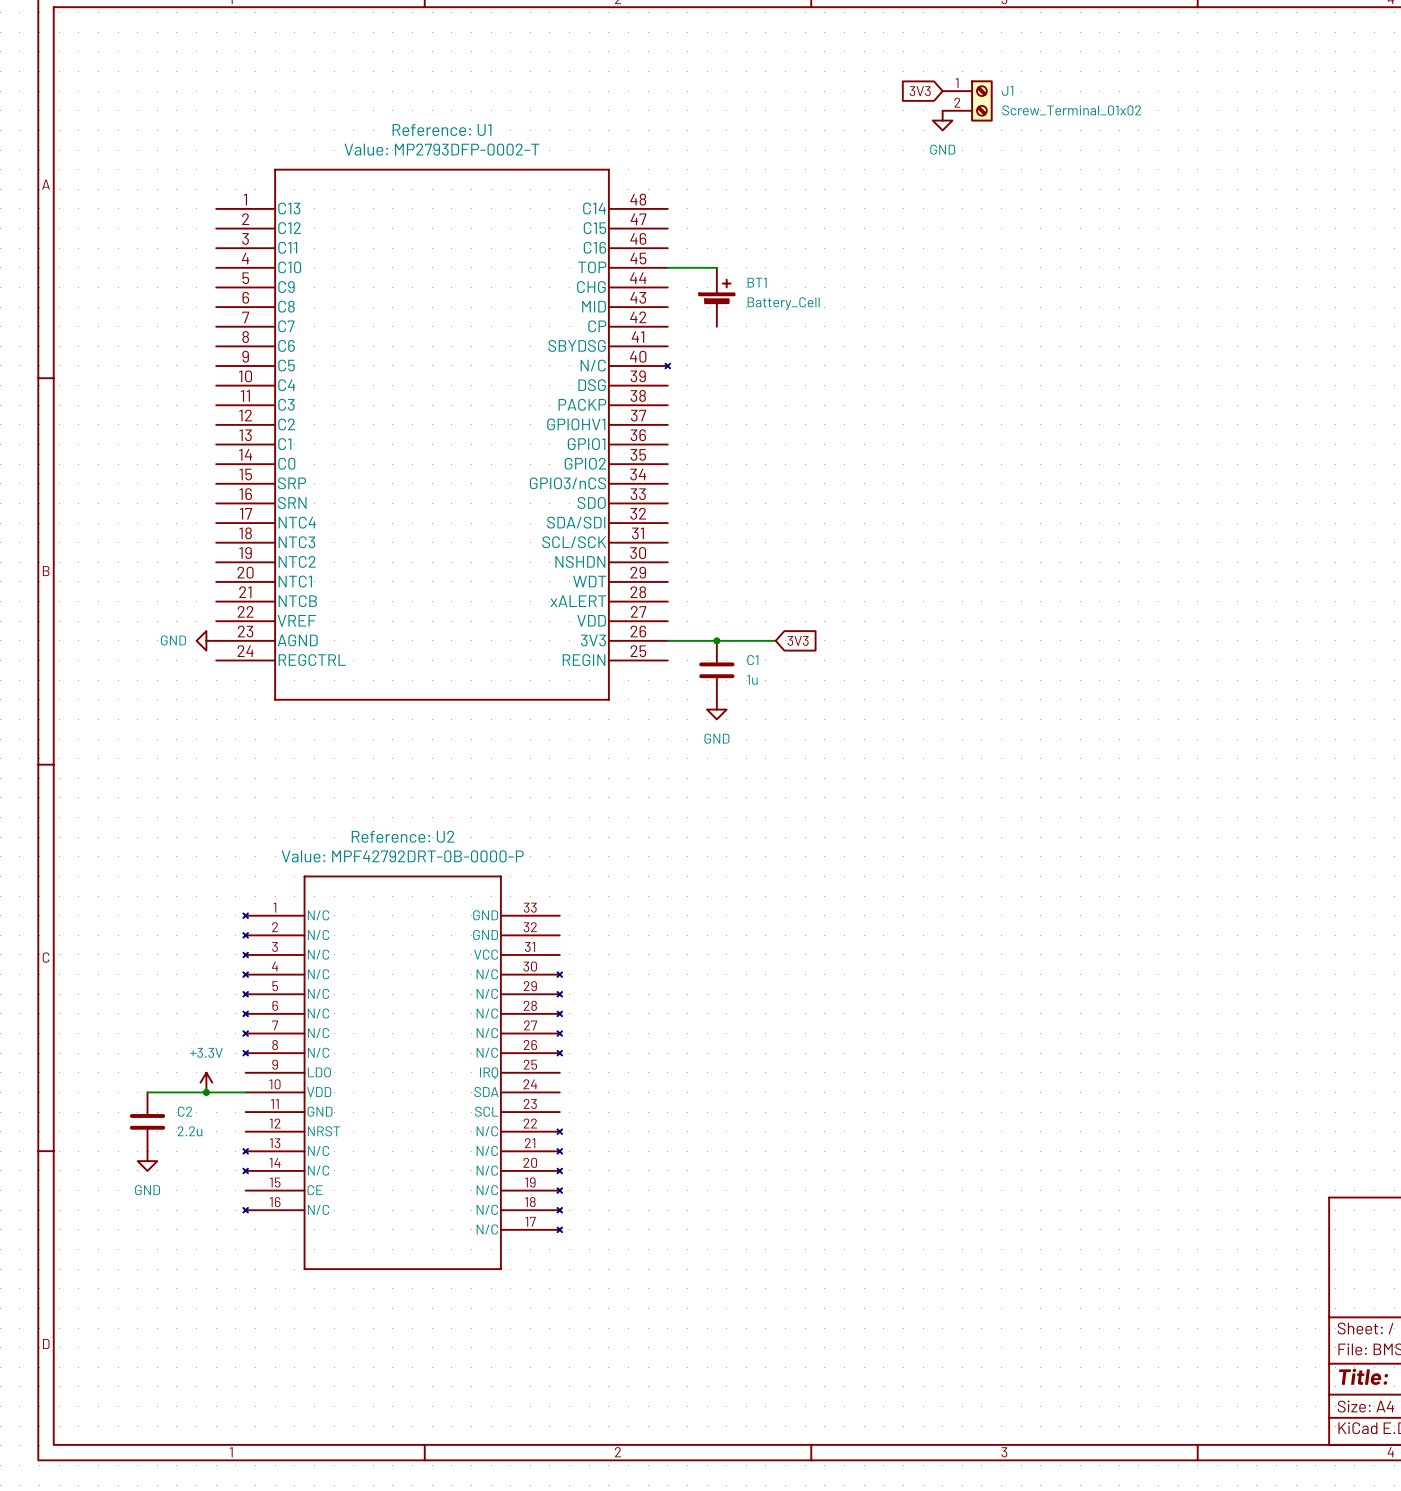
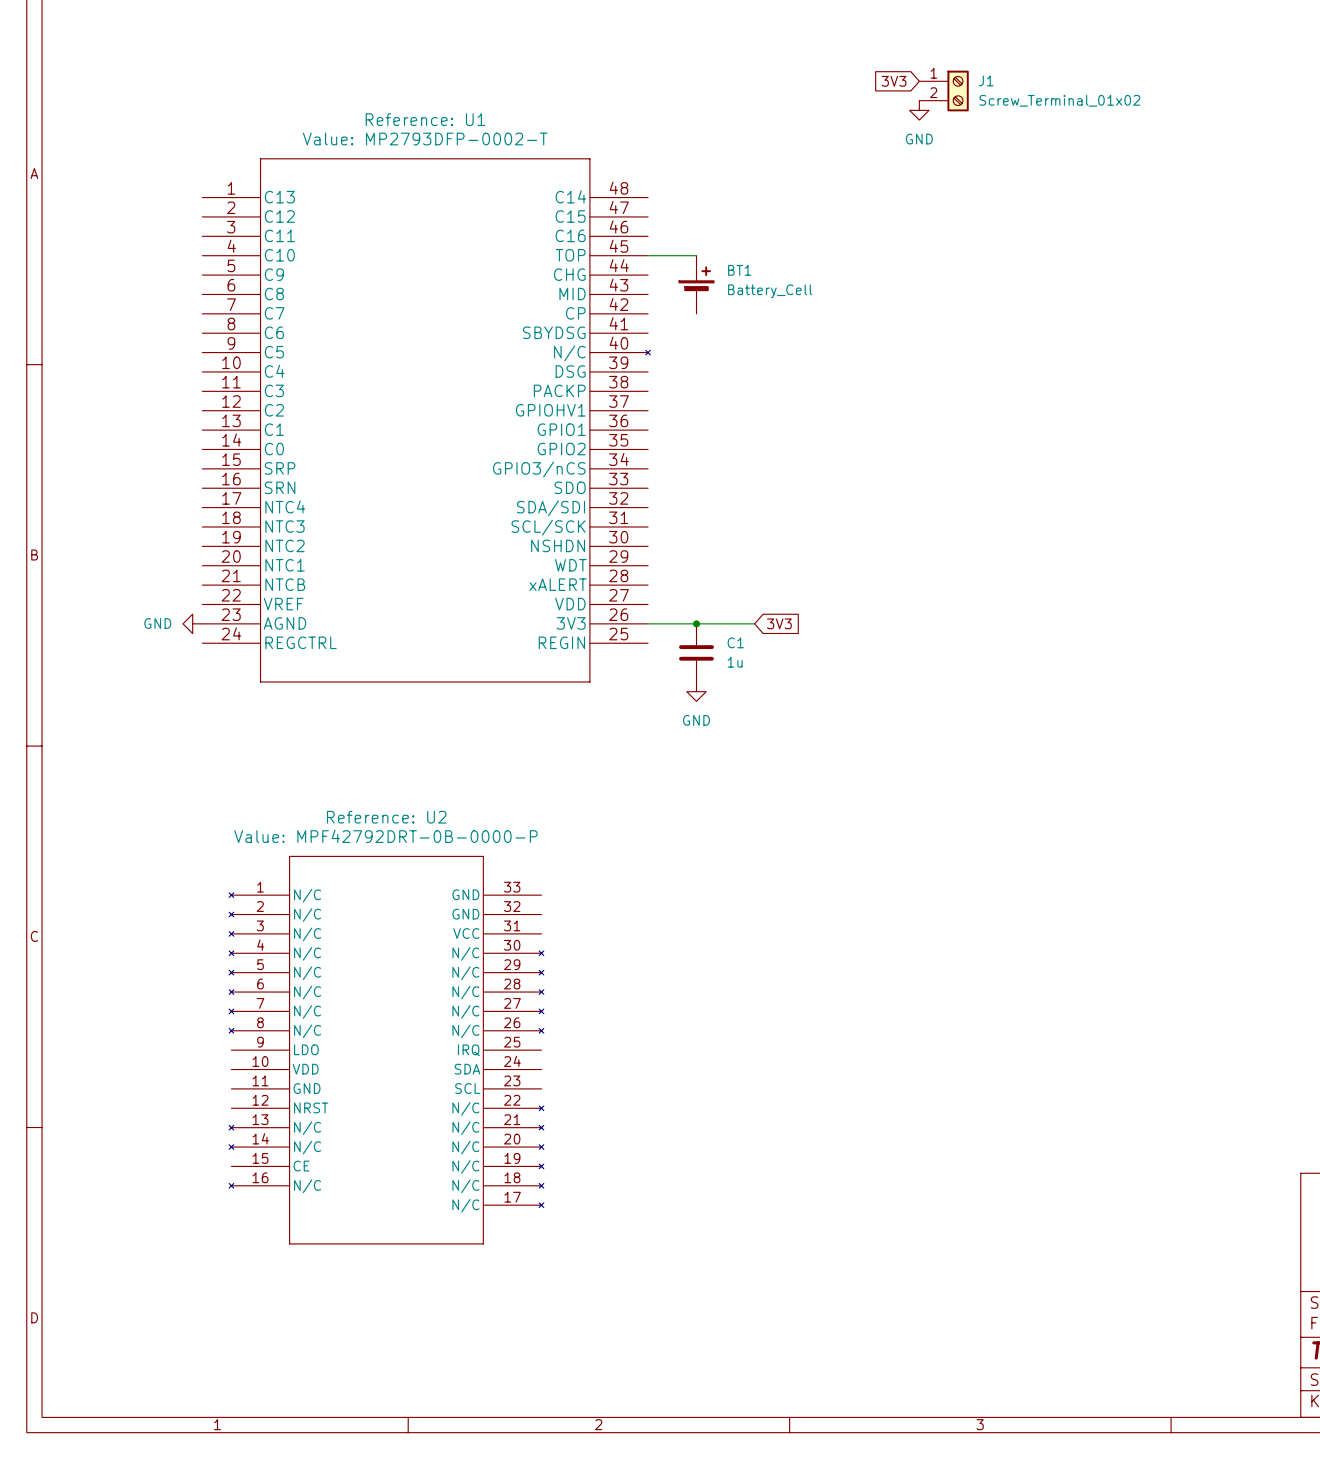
power symbol: +3.3V (206, 1082) -> none
wire: (147, 1092) (245, 1092) -> none
junction: (206, 1092) -> none
C2: 2.2u (147, 1121) -> none
power symbol: GND (147, 1161) -> none

